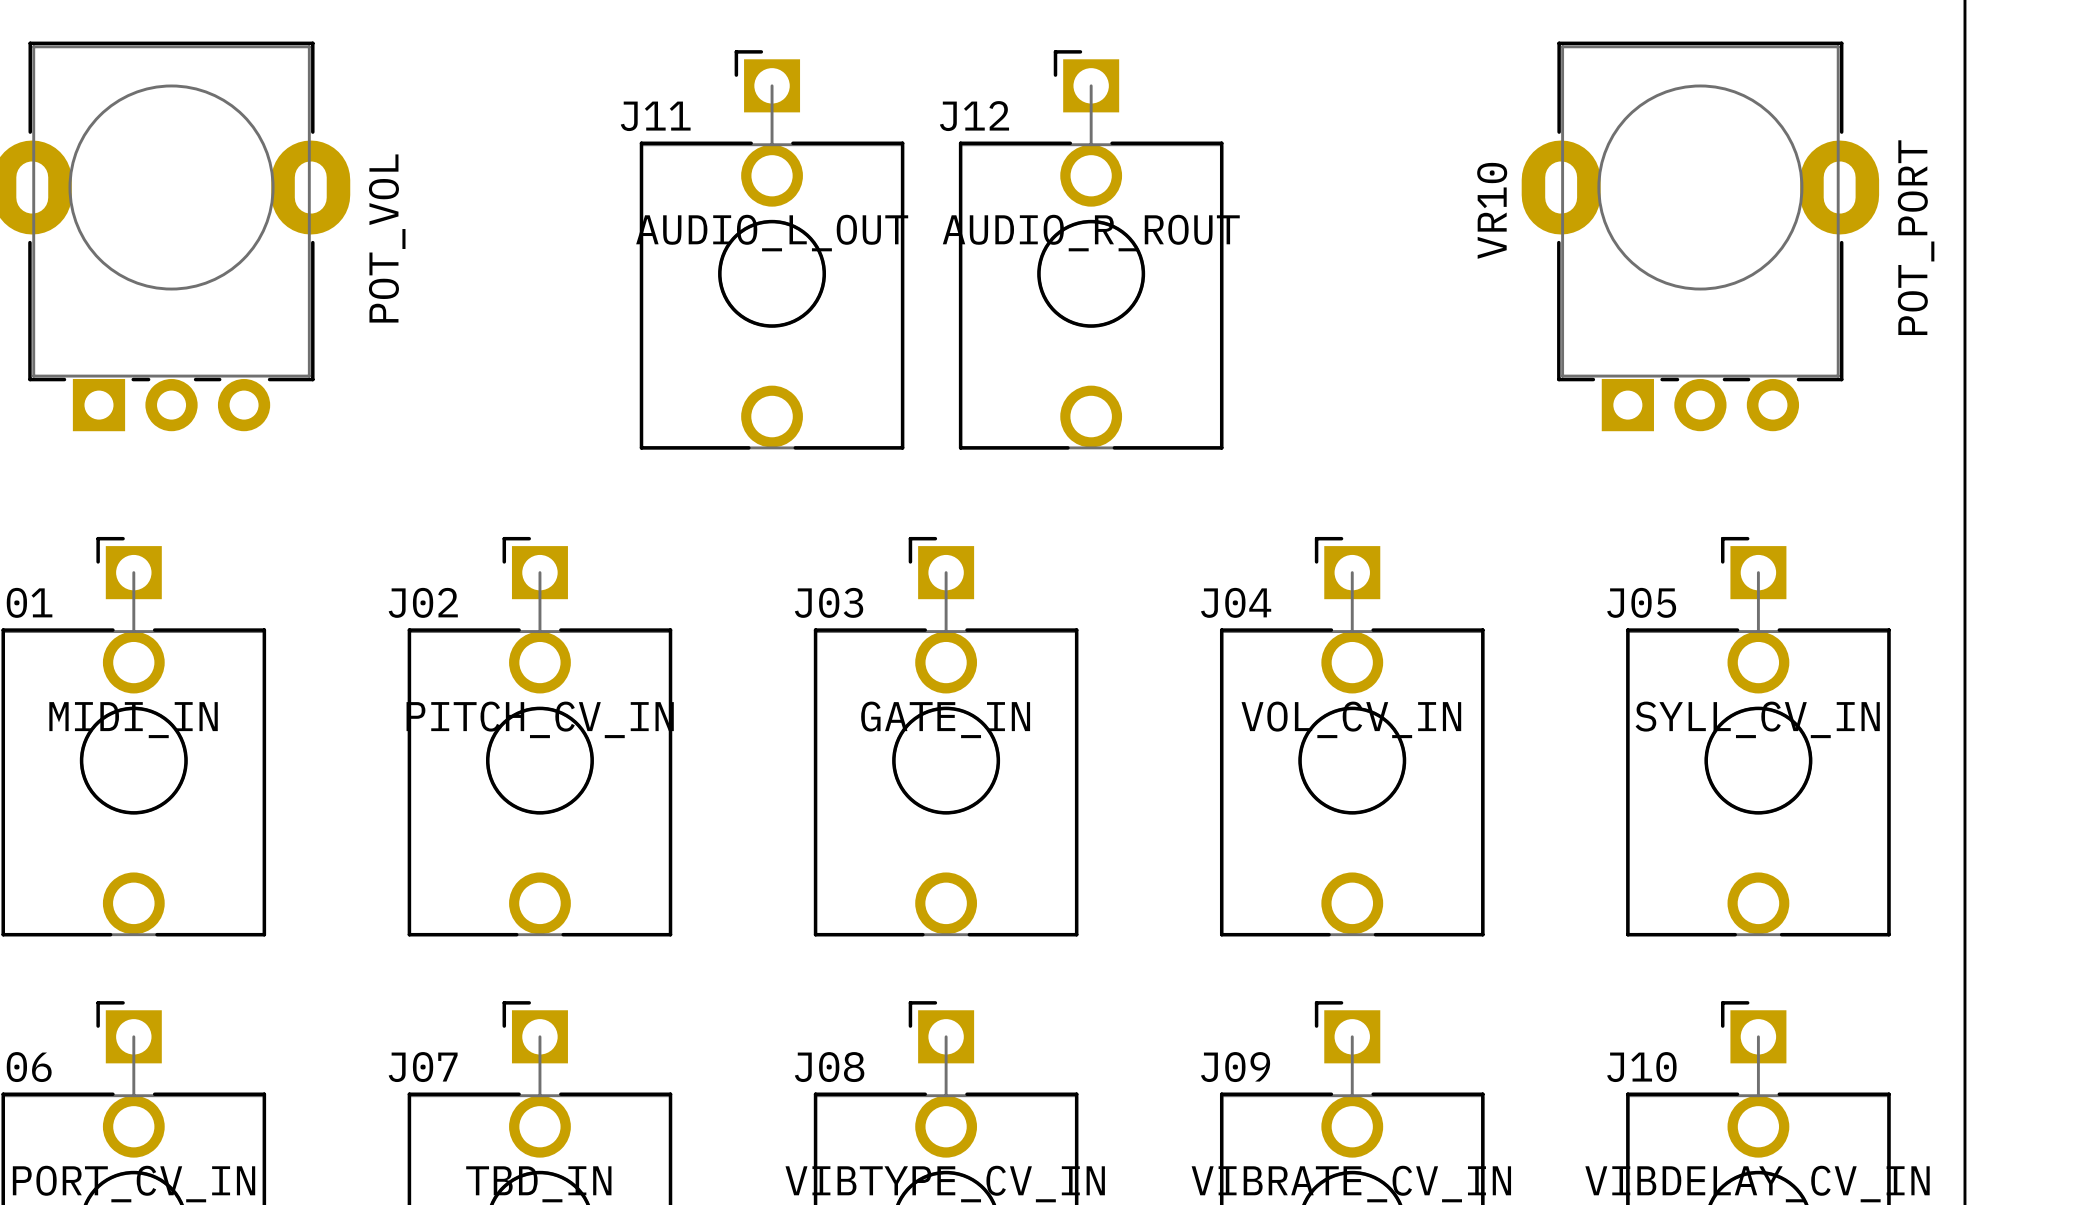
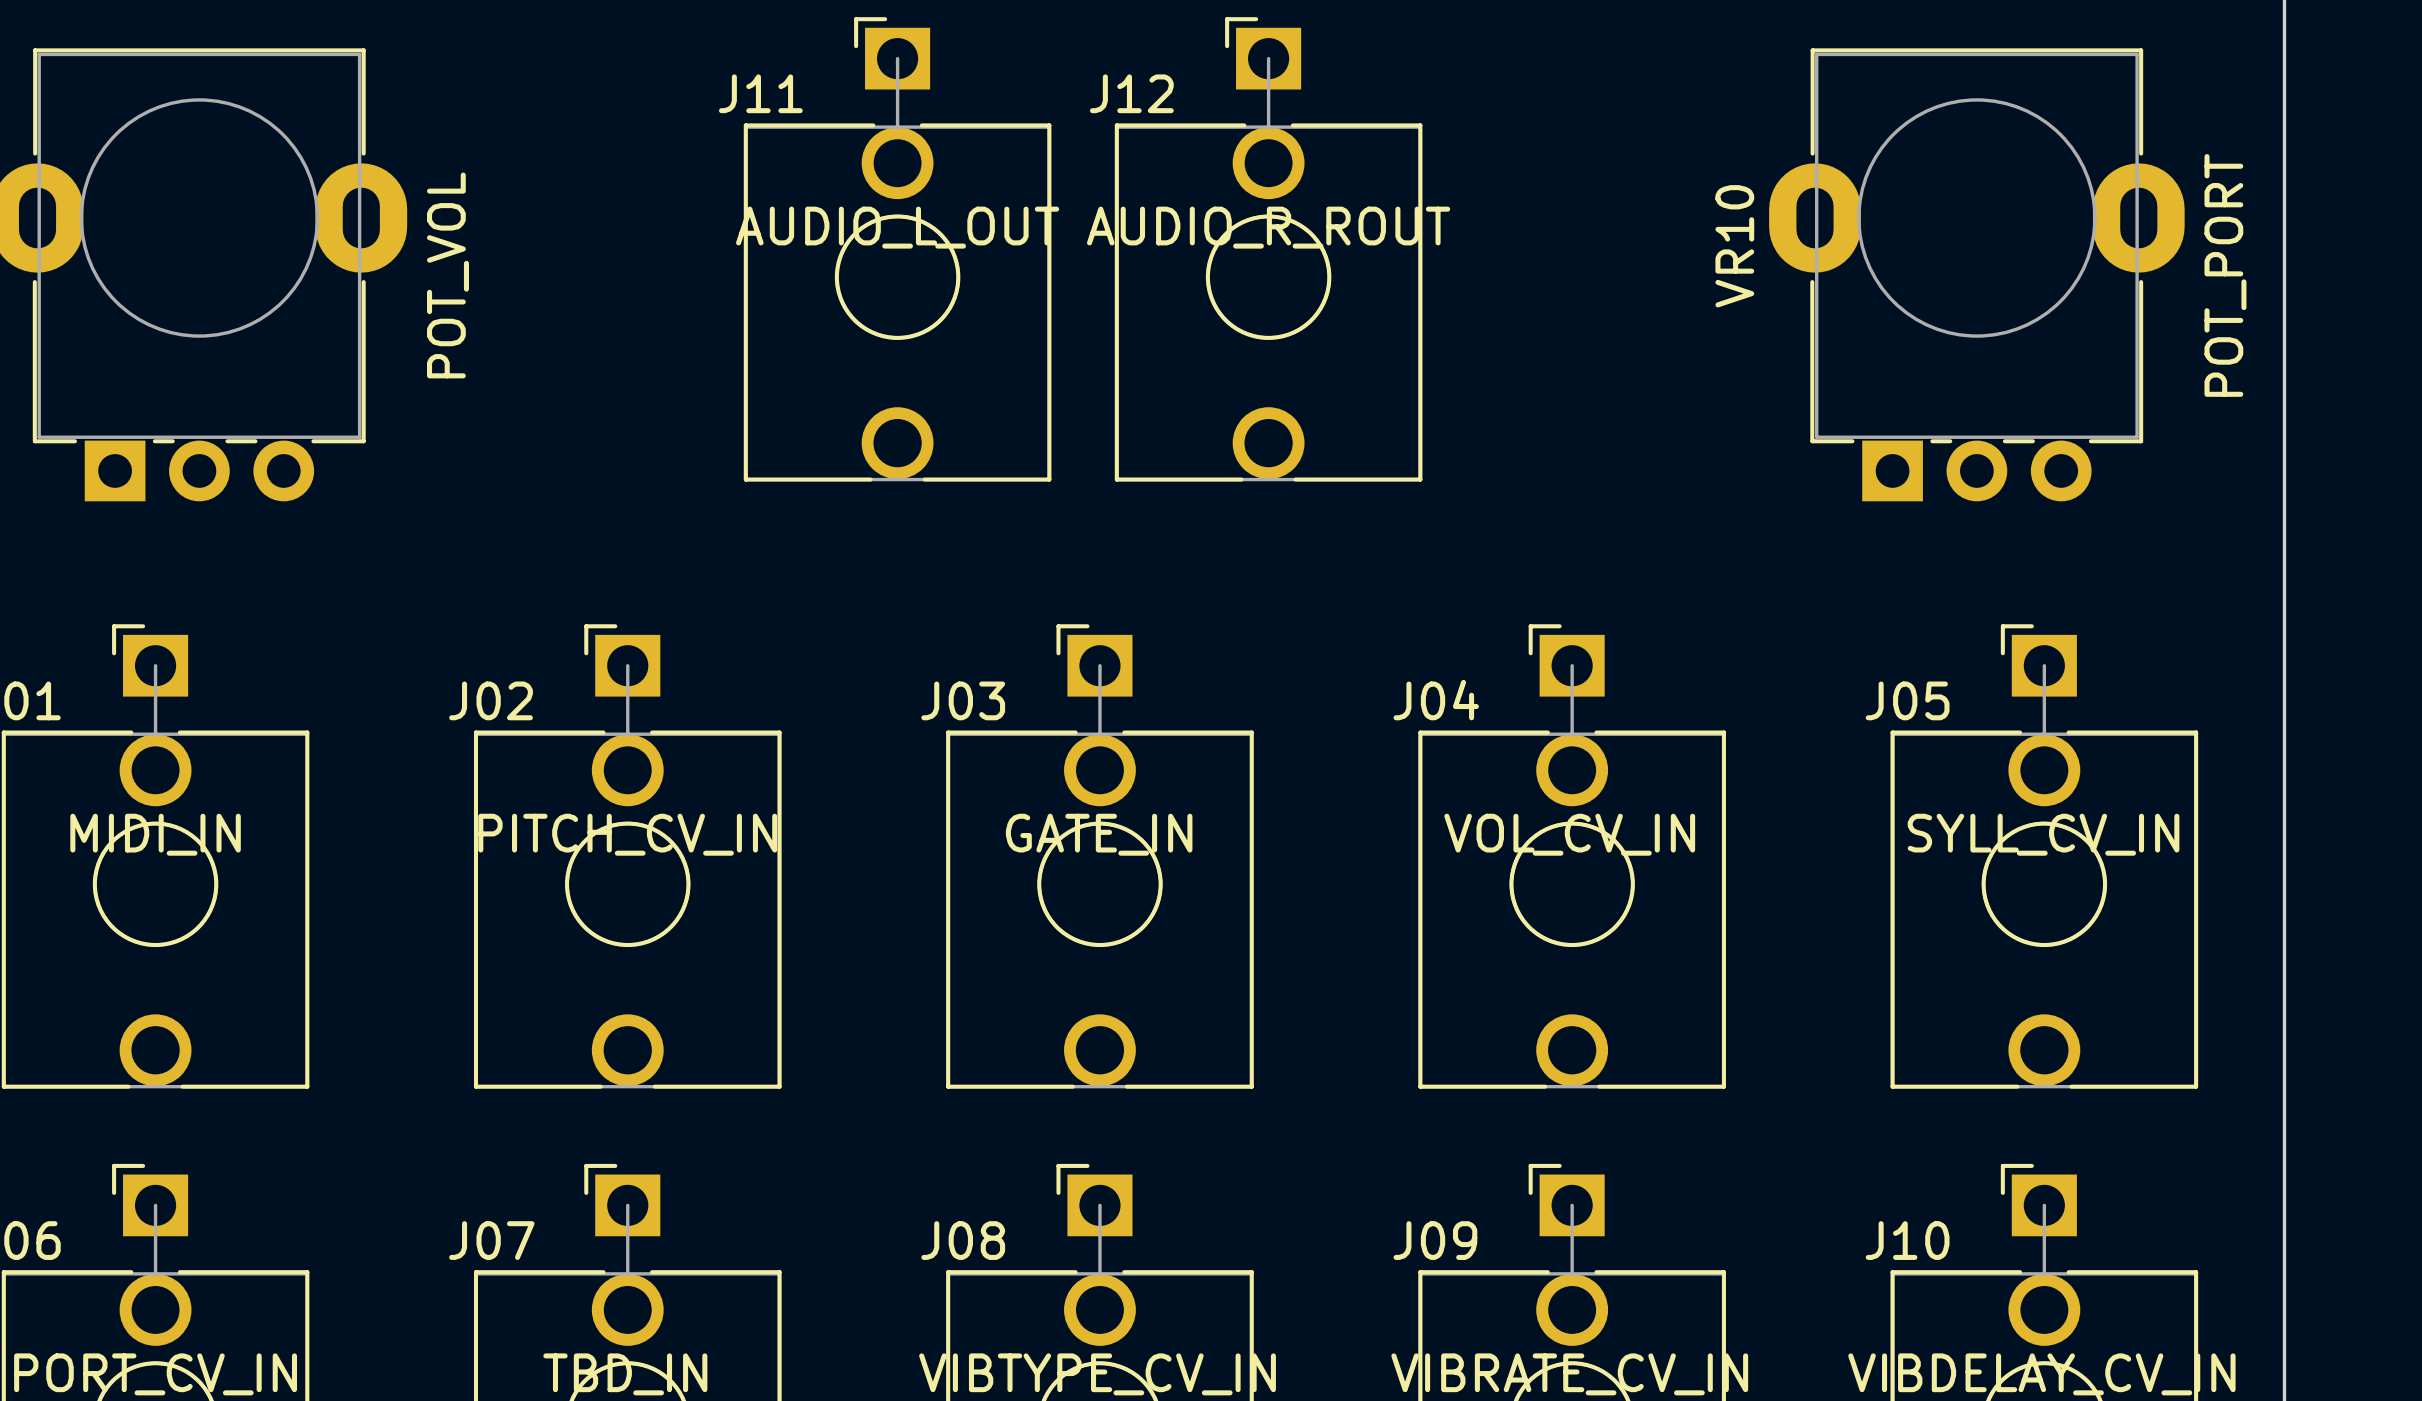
J11 position: (772, 249) -> (897, 249)
J12 position: (1091, 249) -> (1268, 249)

